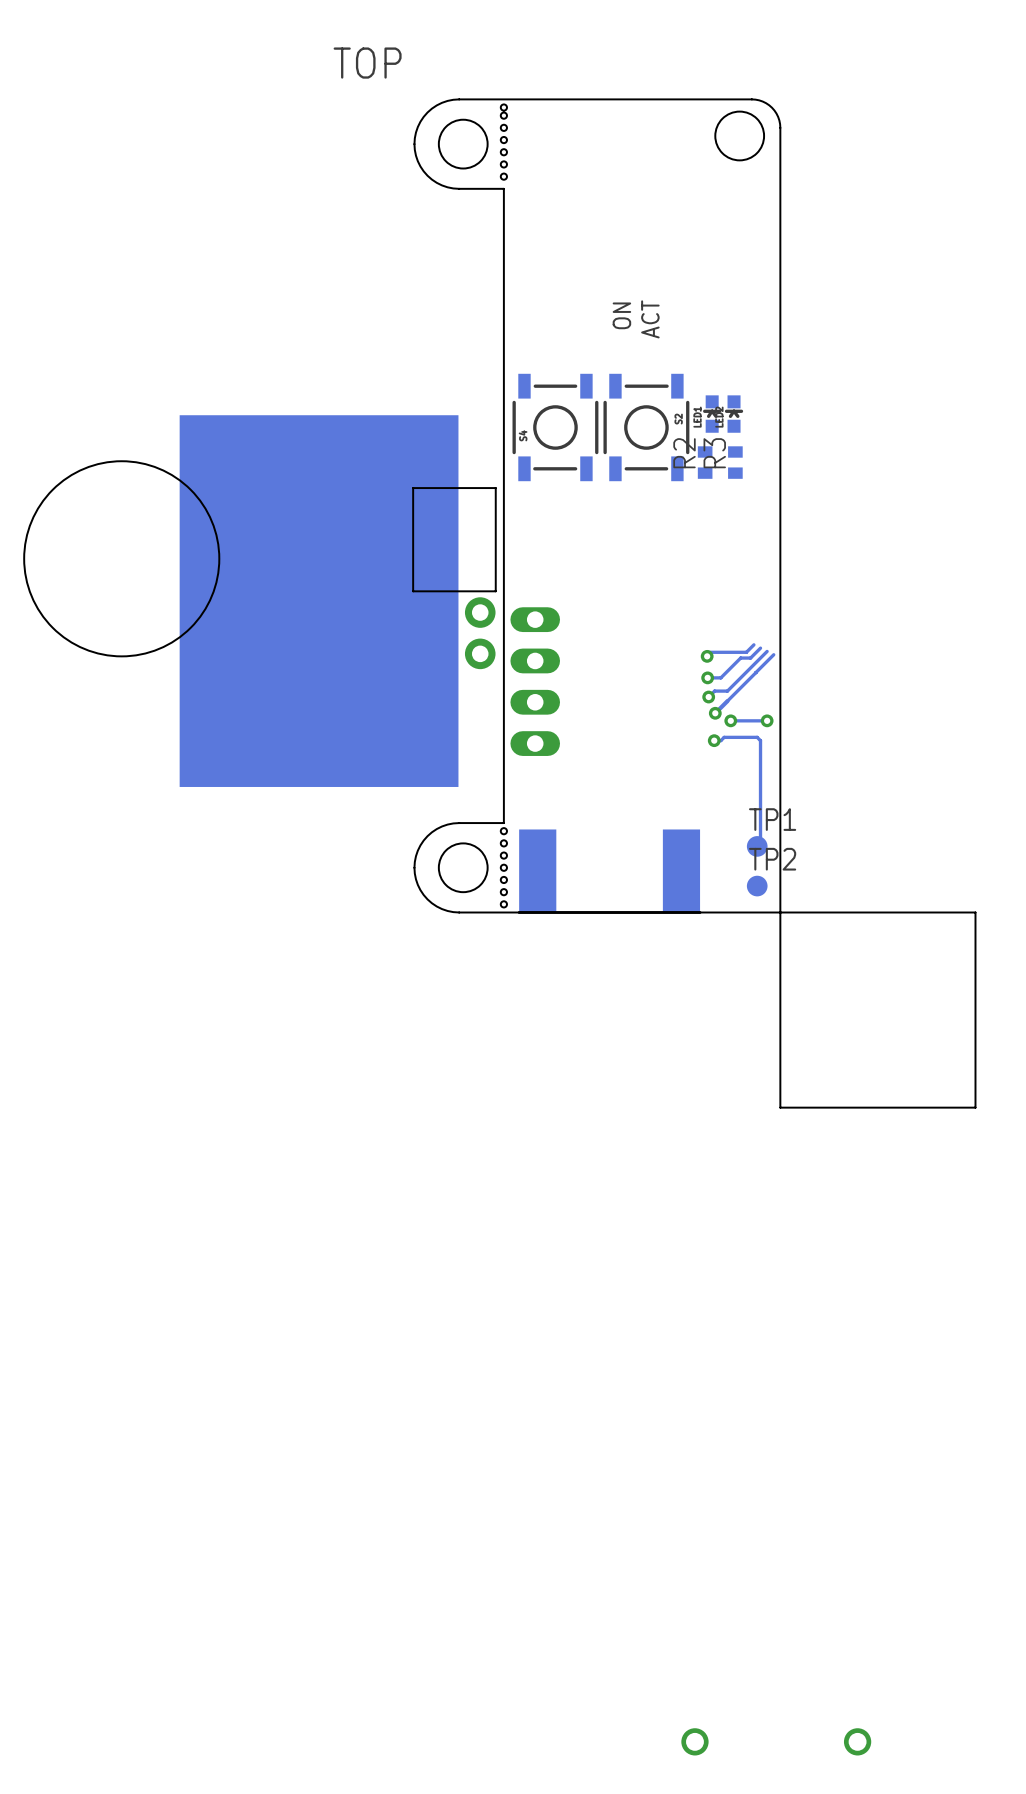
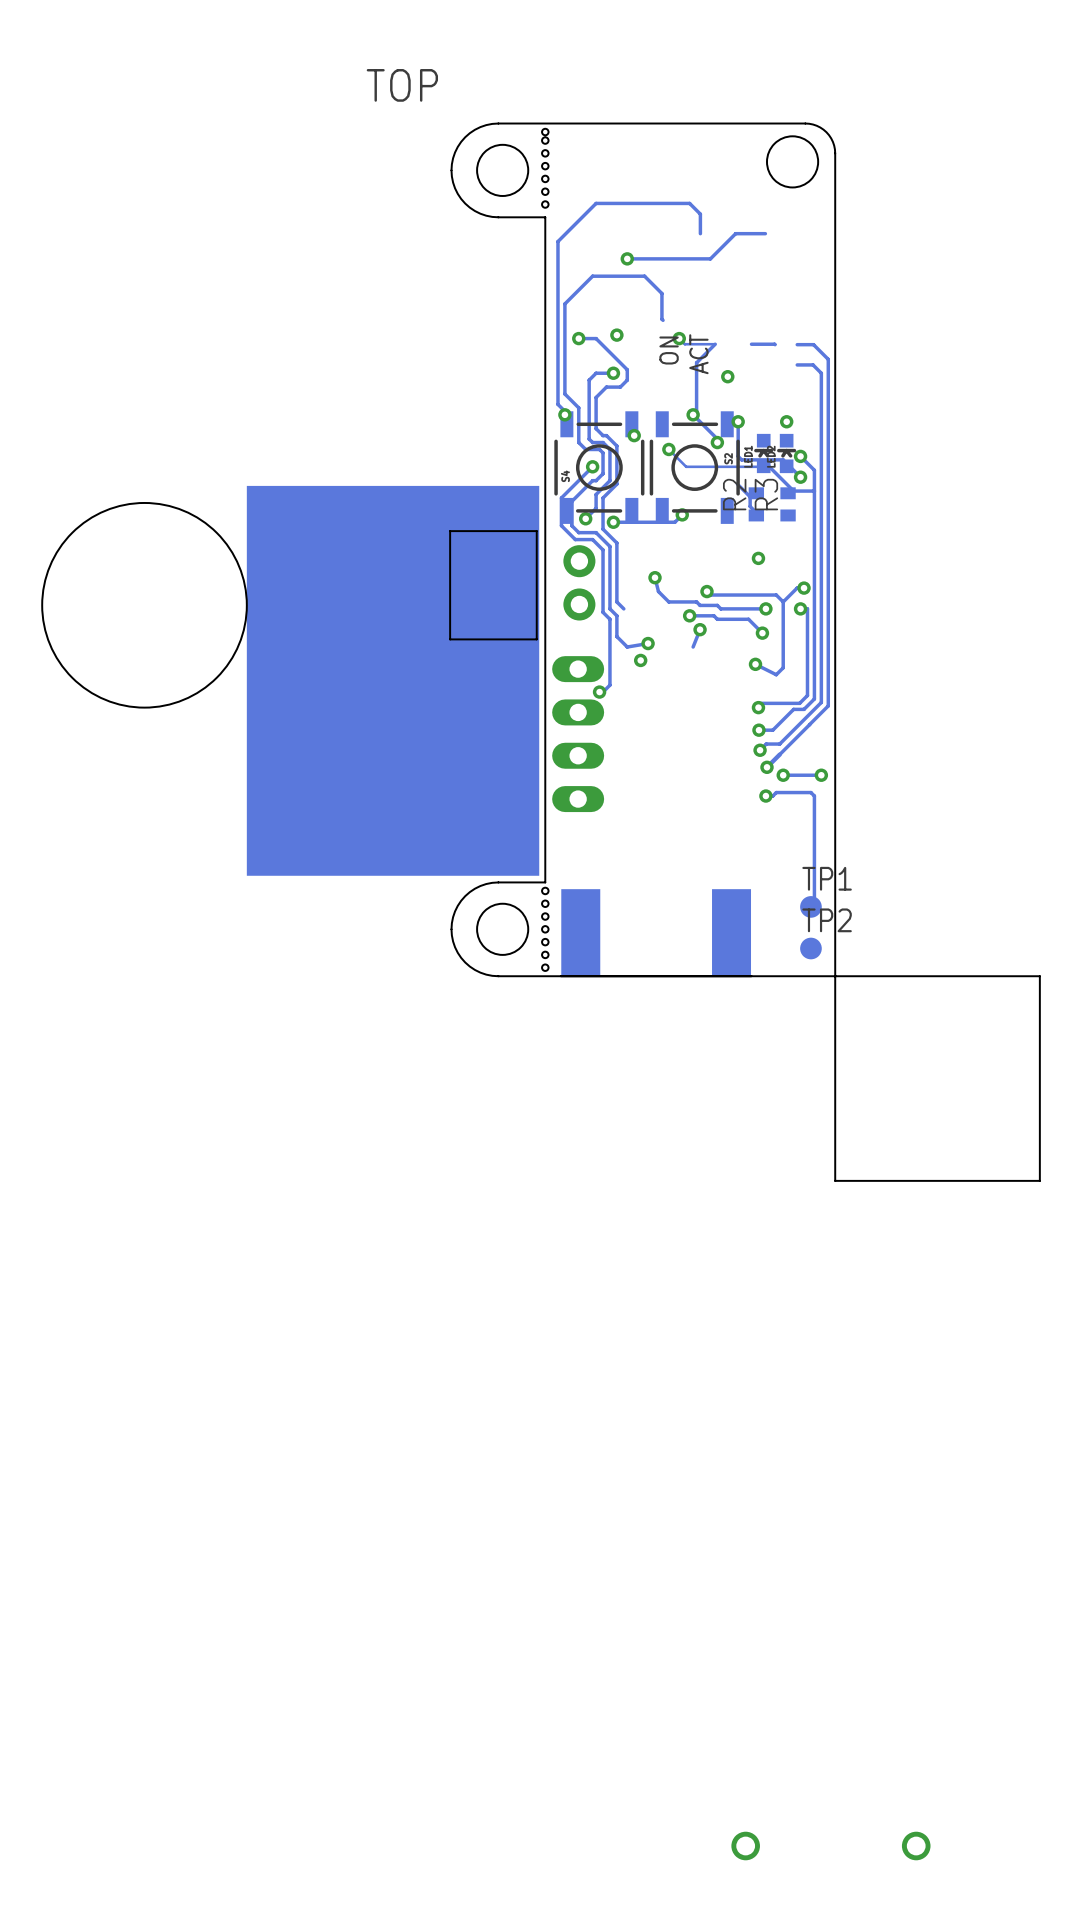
track: none -> (700, 233) (700, 214) (689, 203) (596, 203) (557, 241) (557, 404) (564, 411) (564, 414)
track: none -> (765, 233) (735, 233) (710, 258) (627, 258)
via: none -> (627, 258)
track: none -> (663, 320) (661, 293) (644, 276) (592, 276) (564, 303) (564, 394) (578, 407) (578, 442) (585, 449) (599, 449) (603, 452) (603, 473) (596, 480) (592, 480) (571, 501) (571, 525) (578, 532) (596, 532) (609, 546) (609, 608) (616, 615) (616, 636) (627, 647) (648, 643)
via: none -> (616, 335)
track: none -> (578, 338) (596, 338) (627, 369) (627, 380) (620, 387) (606, 387) (596, 397) (596, 428) (616, 446) (616, 484) (603, 497) (603, 529) (616, 543) (616, 601) (623, 608)
via: none -> (578, 338)
track: none -> (679, 338) (684, 344) (715, 344) (696, 362) (696, 411) (693, 414)
via: none -> (679, 338)
track: none -> (751, 344) (775, 344)
track: none -> (797, 344) (813, 344) (828, 359) (828, 705)
track: none -> (797, 364) (813, 364) (821, 373) (821, 702)
track: none -> (613, 373) (596, 373) (589, 380) (589, 439) (592, 442) (603, 442) (609, 449) (609, 480) (596, 494) (596, 508) (585, 518)
via: none -> (613, 373)
via: none -> (727, 376)
via: none -> (564, 414)
track: none -> (693, 414) (717, 439) (717, 442)
via: none -> (693, 414)
track: none -> (738, 421) (738, 456) (741, 459) (783, 459) (800, 477)
via: none -> (738, 421)
via: none -> (786, 421)
via: none -> (634, 435)
via: none -> (717, 442)
track: none -> (668, 449) (686, 466) (769, 466) (793, 491) (814, 491)
via: none -> (668, 449)
track: none -> (800, 456) (814, 470) (814, 698)
via: none -> (800, 456)
track: none -> (592, 466) (561, 497) (561, 525) (575, 539) (592, 539) (603, 549) (603, 612) (609, 619) (609, 685) (603, 692) (599, 692)
via: none -> (592, 466)
via: none -> (800, 477)
track: none -> (737, 484) (750, 496) (750, 506) (755, 511)
track: none -> (682, 514) (674, 522) (613, 522)
via: none -> (682, 514)
via: none -> (585, 518)
via: none -> (613, 522)
via: none -> (758, 558)
track: none -> (655, 577) (658, 591) (668, 601) (696, 601) (700, 605) (717, 605) (720, 608) (765, 608)
via: none -> (655, 577)
track: none -> (804, 588) (797, 588) (783, 601)
via: none -> (804, 588)
track: none -> (706, 591) (710, 595) (776, 595) (783, 601)
via: none -> (706, 591)
track: none -> (783, 601) (783, 667) (776, 674) (755, 664)
via: none -> (765, 608)
track: none -> (800, 608) (807, 608) (807, 695)
via: none -> (800, 608)
track: none -> (689, 615) (713, 615) (717, 619) (748, 619) (762, 633)
via: none -> (689, 615)
track: none -> (700, 629) (693, 647)
via: none -> (700, 629)
via: none -> (762, 633)
via: none -> (648, 643)
drawing position: (319, 601) -> (393, 680)
via: none -> (640, 660)
via: none -> (755, 664)
part position: (480, 633) -> (579, 582)
via: none -> (599, 692)

